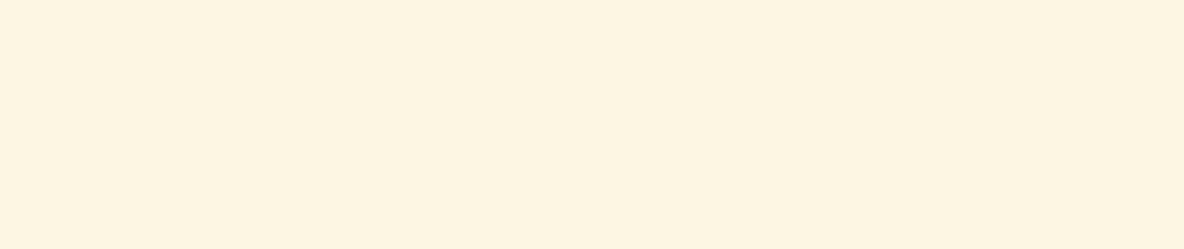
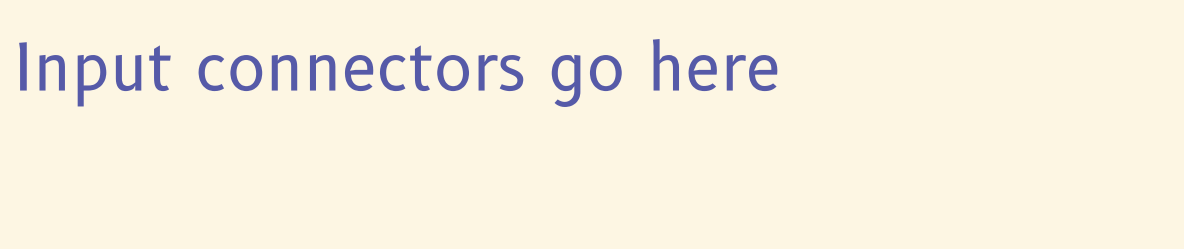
text: none -> Input connectors go here (398, 73)

